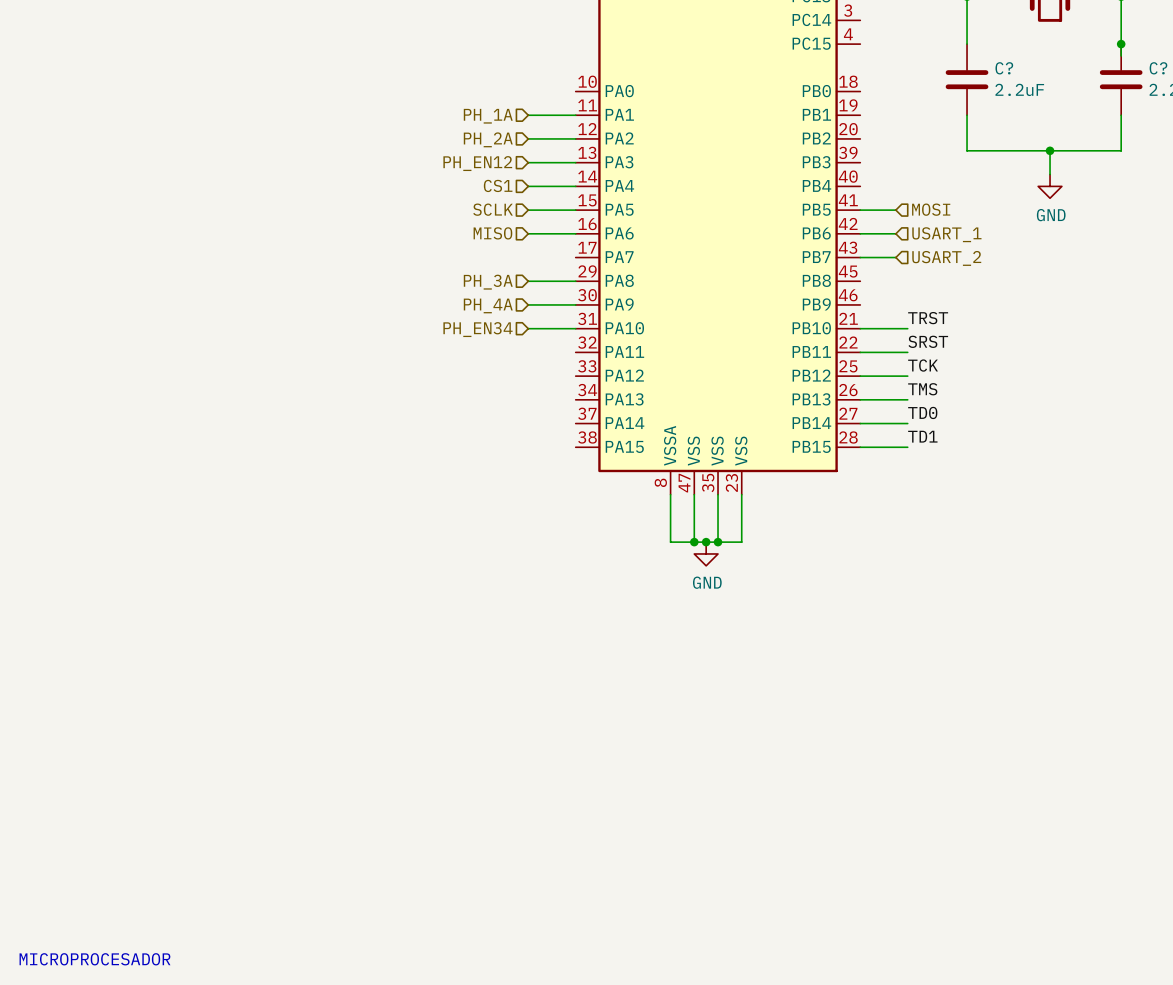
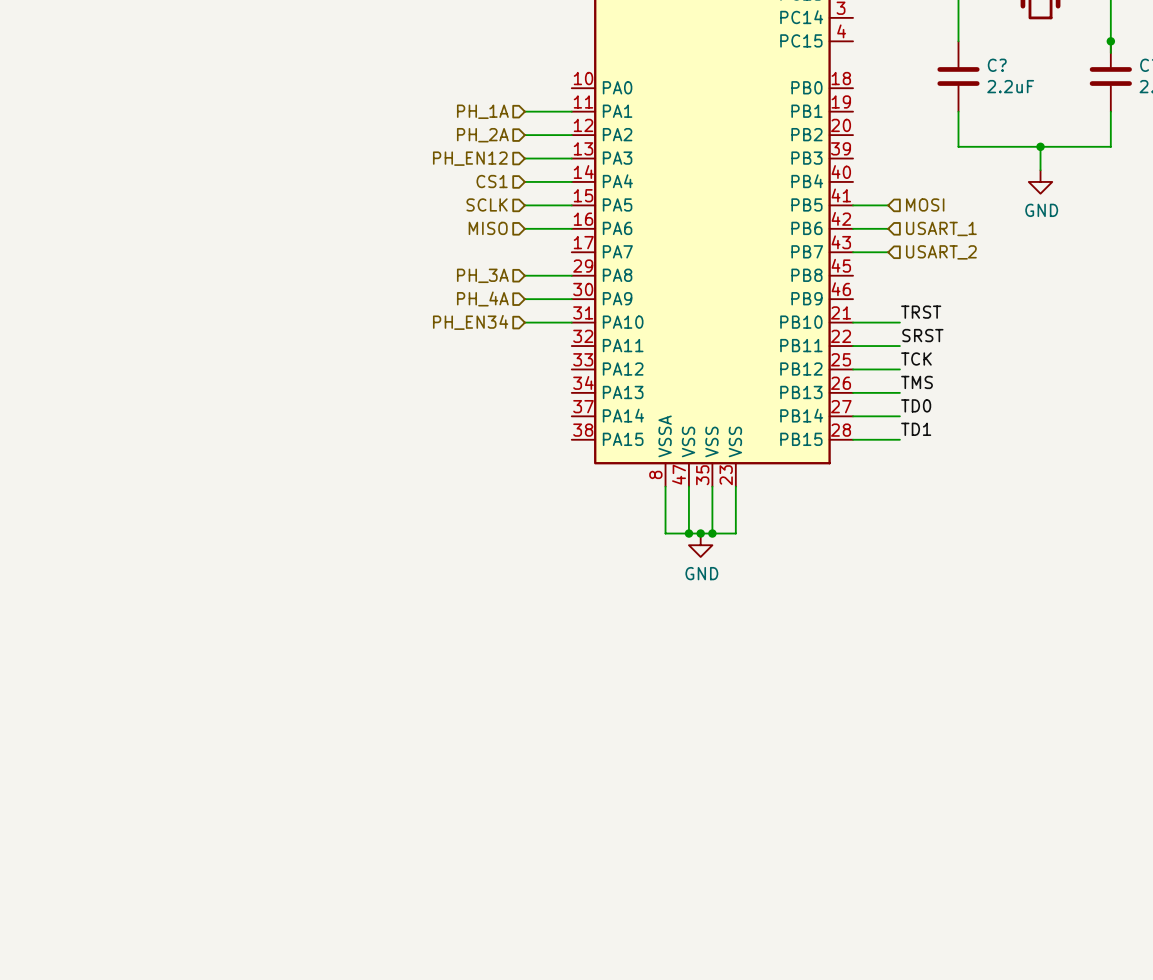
text: MICROPROCESADOR (95, 959) -> none

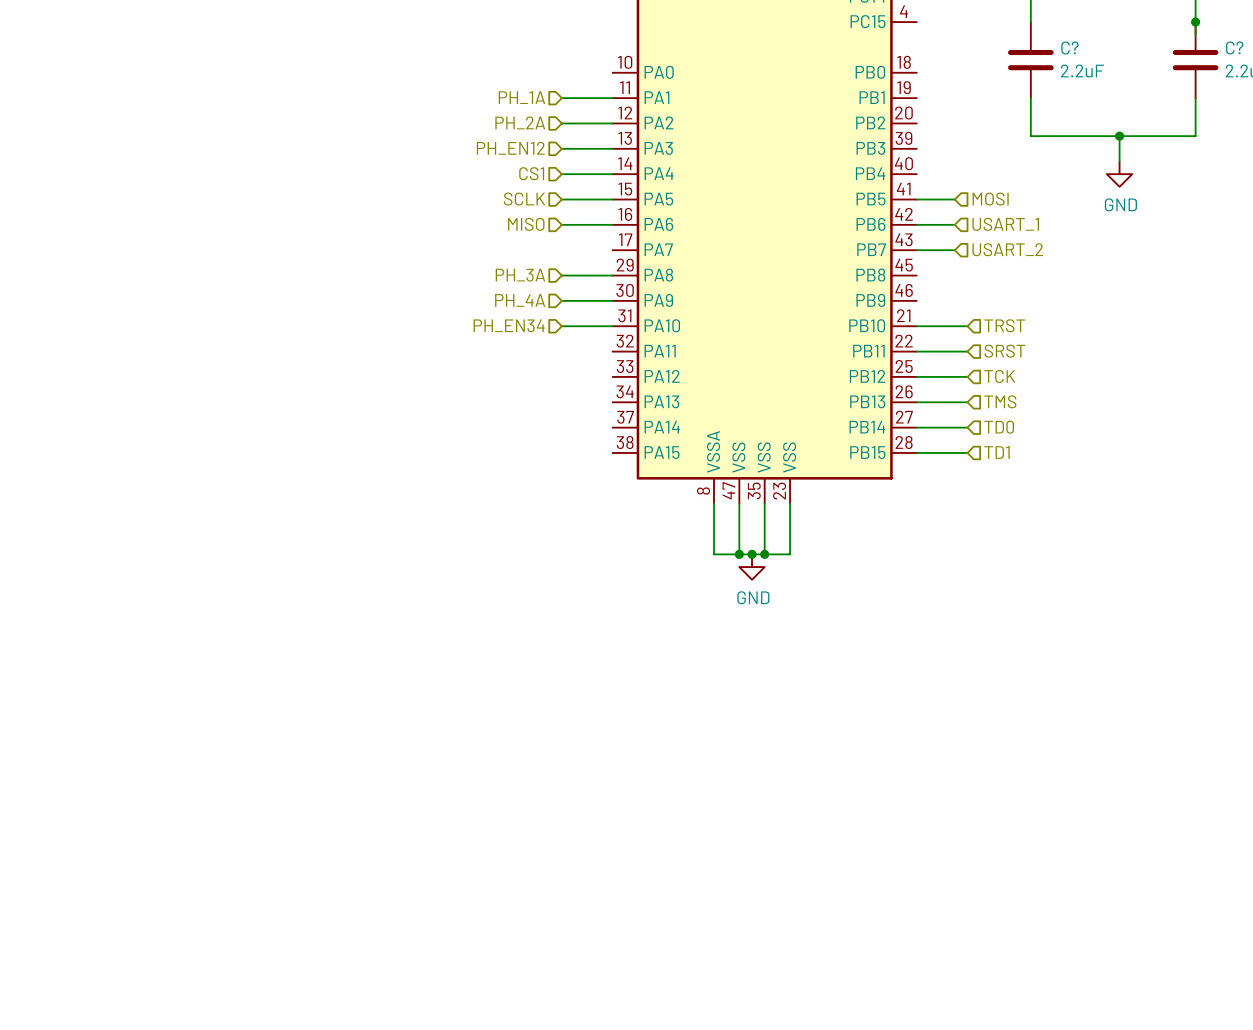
label: TRST (921, 312) -> none
hierarchical label: none -> TRST (1004, 325)
label: SRST (922, 335) -> none
hierarchical label: none -> SRST (1004, 351)
label: TCK (916, 359) -> none
hierarchical label: none -> TCK (999, 376)
label: TMS (917, 382) -> none
hierarchical label: none -> TMS (1000, 401)
label: TD0 (916, 405) -> none
hierarchical label: none -> TD0 (999, 427)
label: TD1 (916, 429) -> none
hierarchical label: none -> TD1 (997, 452)

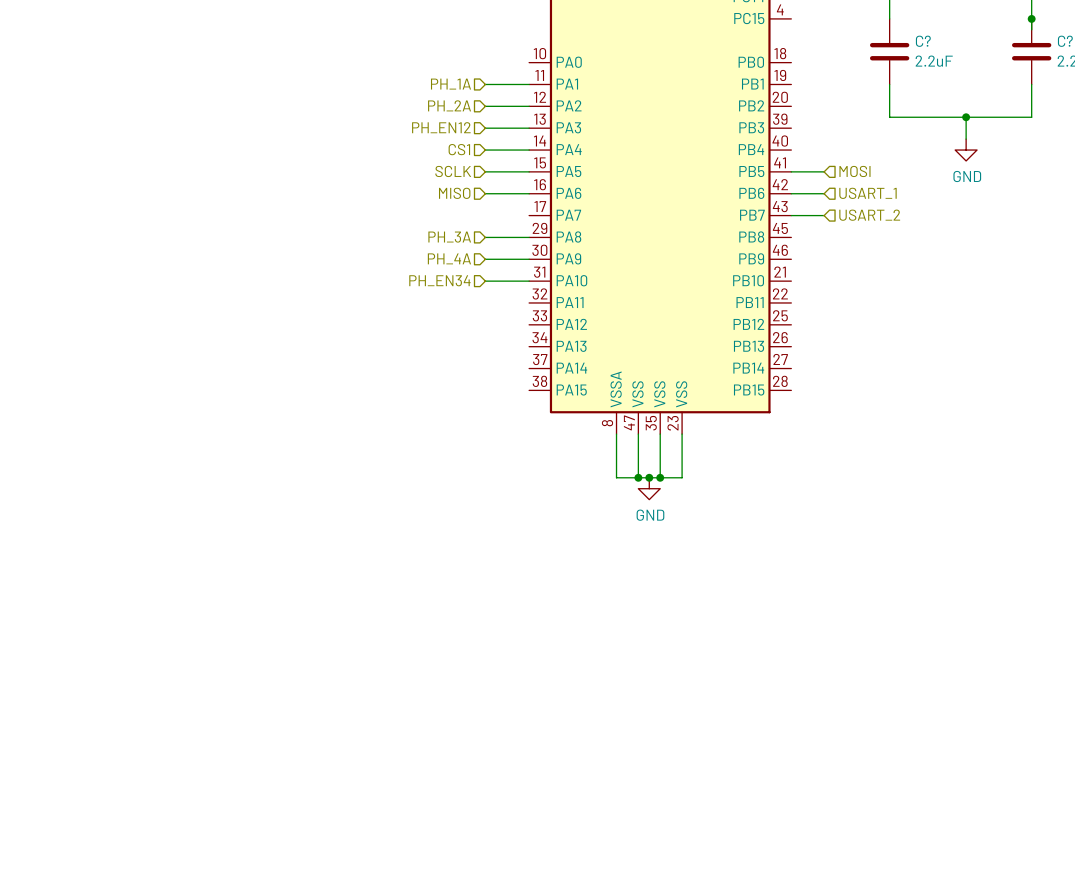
hierarchical label: TRST (1004, 325) -> none
wire: (916, 326) (967, 326) -> none
wire: (916, 351) (967, 351) -> none
hierarchical label: SRST (1004, 351) -> none
wire: (916, 376) (967, 376) -> none
hierarchical label: TCK (999, 376) -> none
hierarchical label: TMS (1000, 401) -> none
wire: (916, 402) (967, 402) -> none
wire: (916, 427) (967, 427) -> none
hierarchical label: TD0 (999, 427) -> none
wire: (916, 452) (967, 452) -> none
hierarchical label: TD1 (997, 452) -> none

